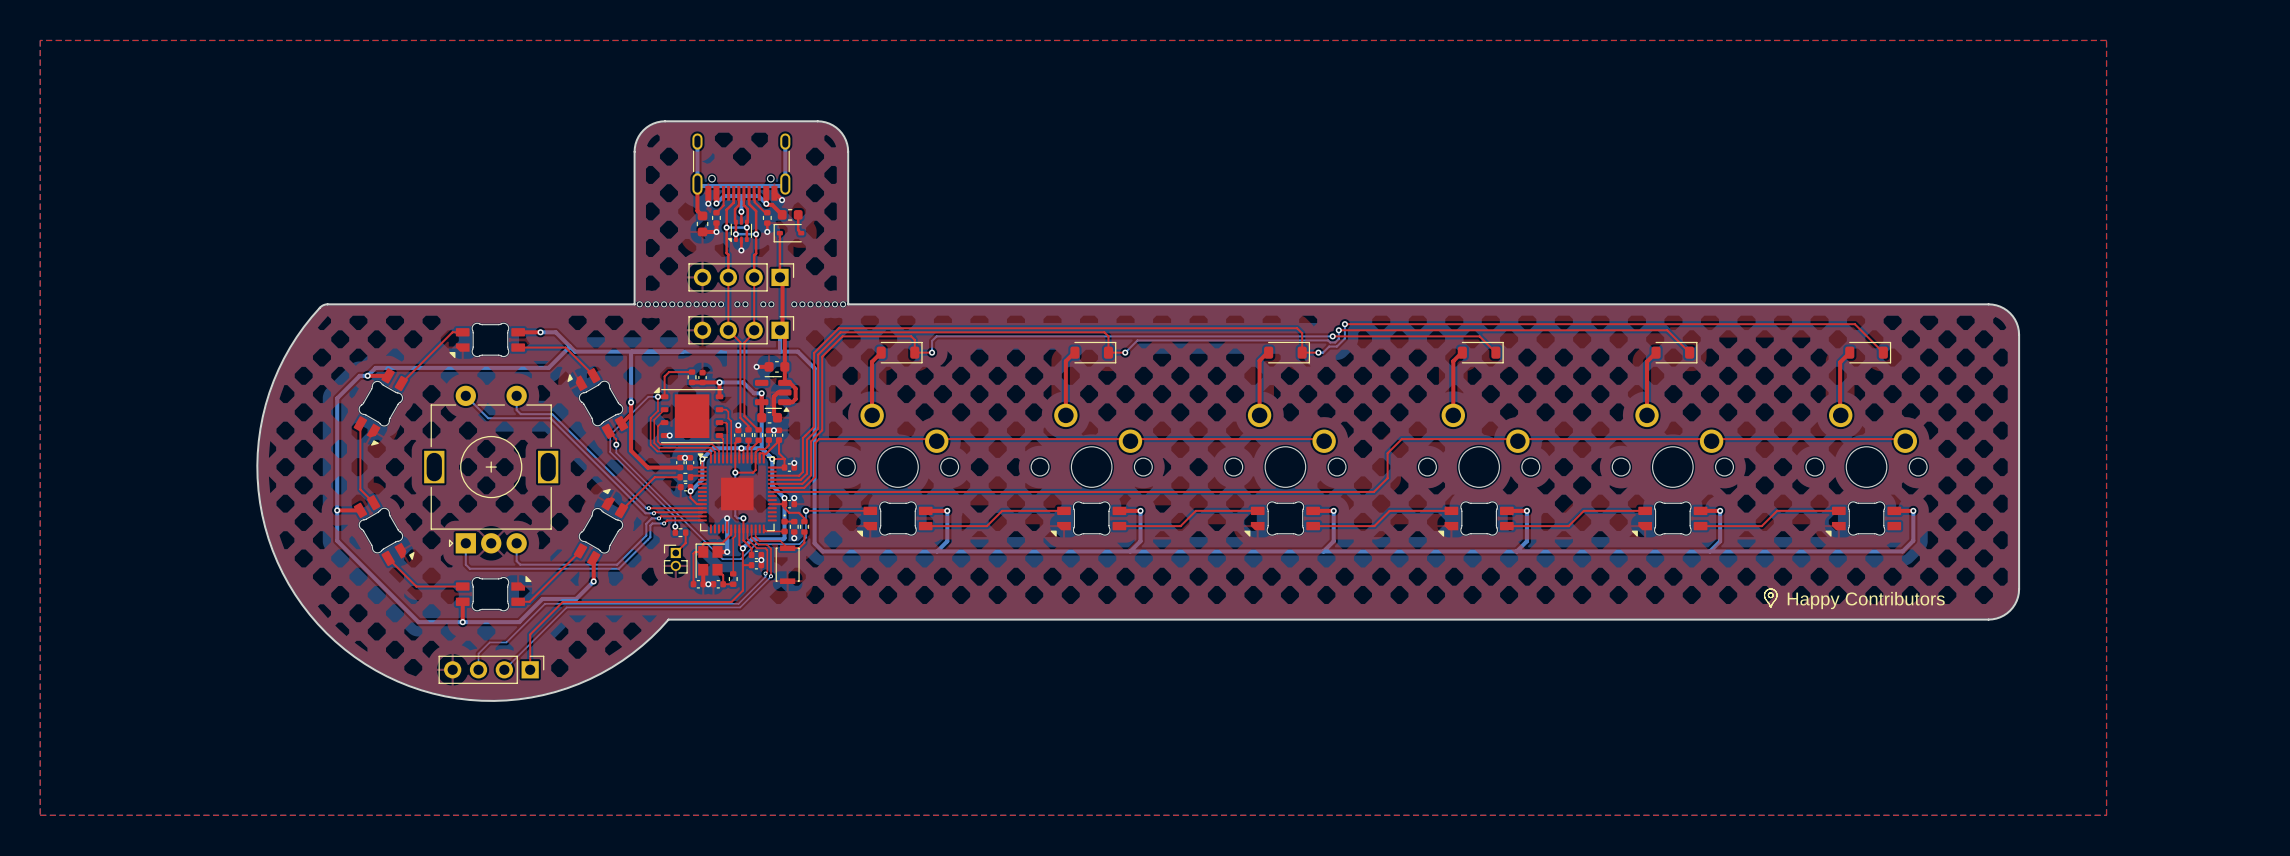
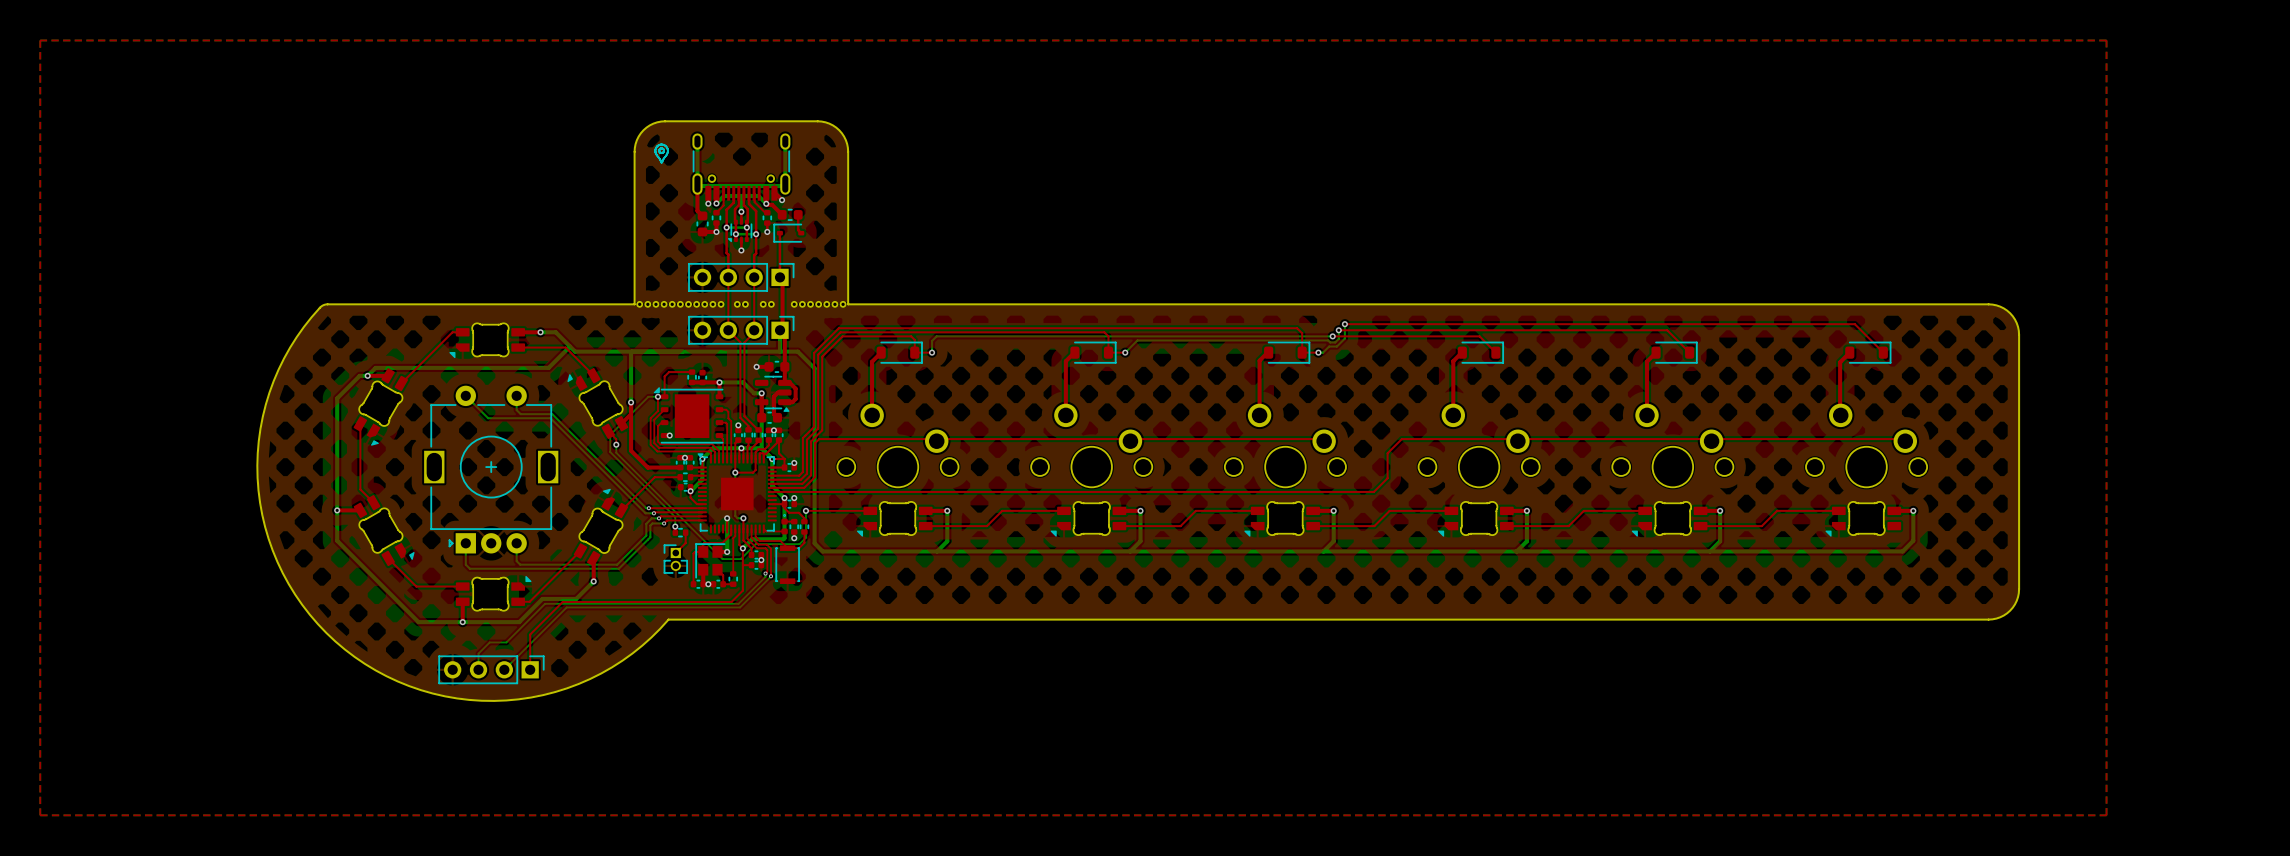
line: none -> (659, 149) (663, 148) (663, 152)
line: none -> (659, 149) (660, 152) (663, 152)
line: none -> (661, 161) (655, 150) (657, 146) (661, 144) (666, 146) (667, 150) (662, 161)
line: (1768, 593) (1772, 593) (1772, 596) -> none
line: (1768, 594) (1769, 597) (1772, 596) -> none
text: Happy Contributors (1866, 600) -> none
line: (1770, 606) (1764, 595) (1766, 590) (1770, 589) (1775, 590) (1776, 594) (1771, 606) -> none

